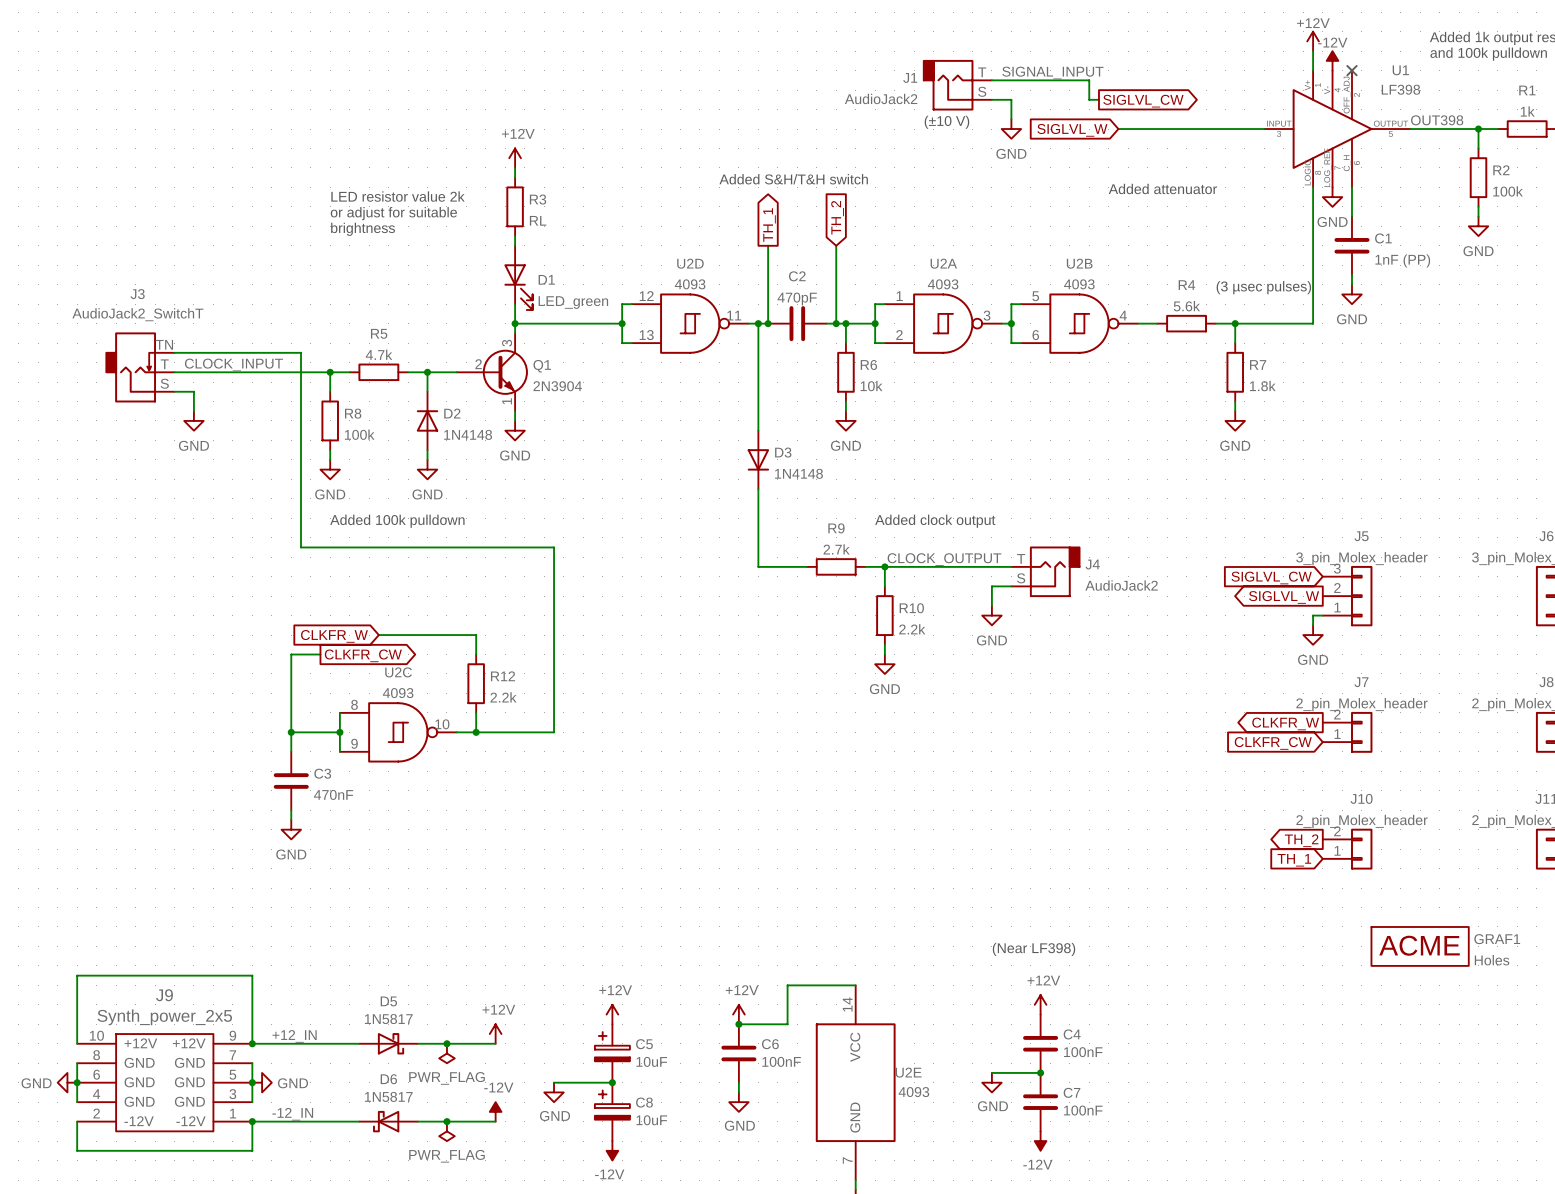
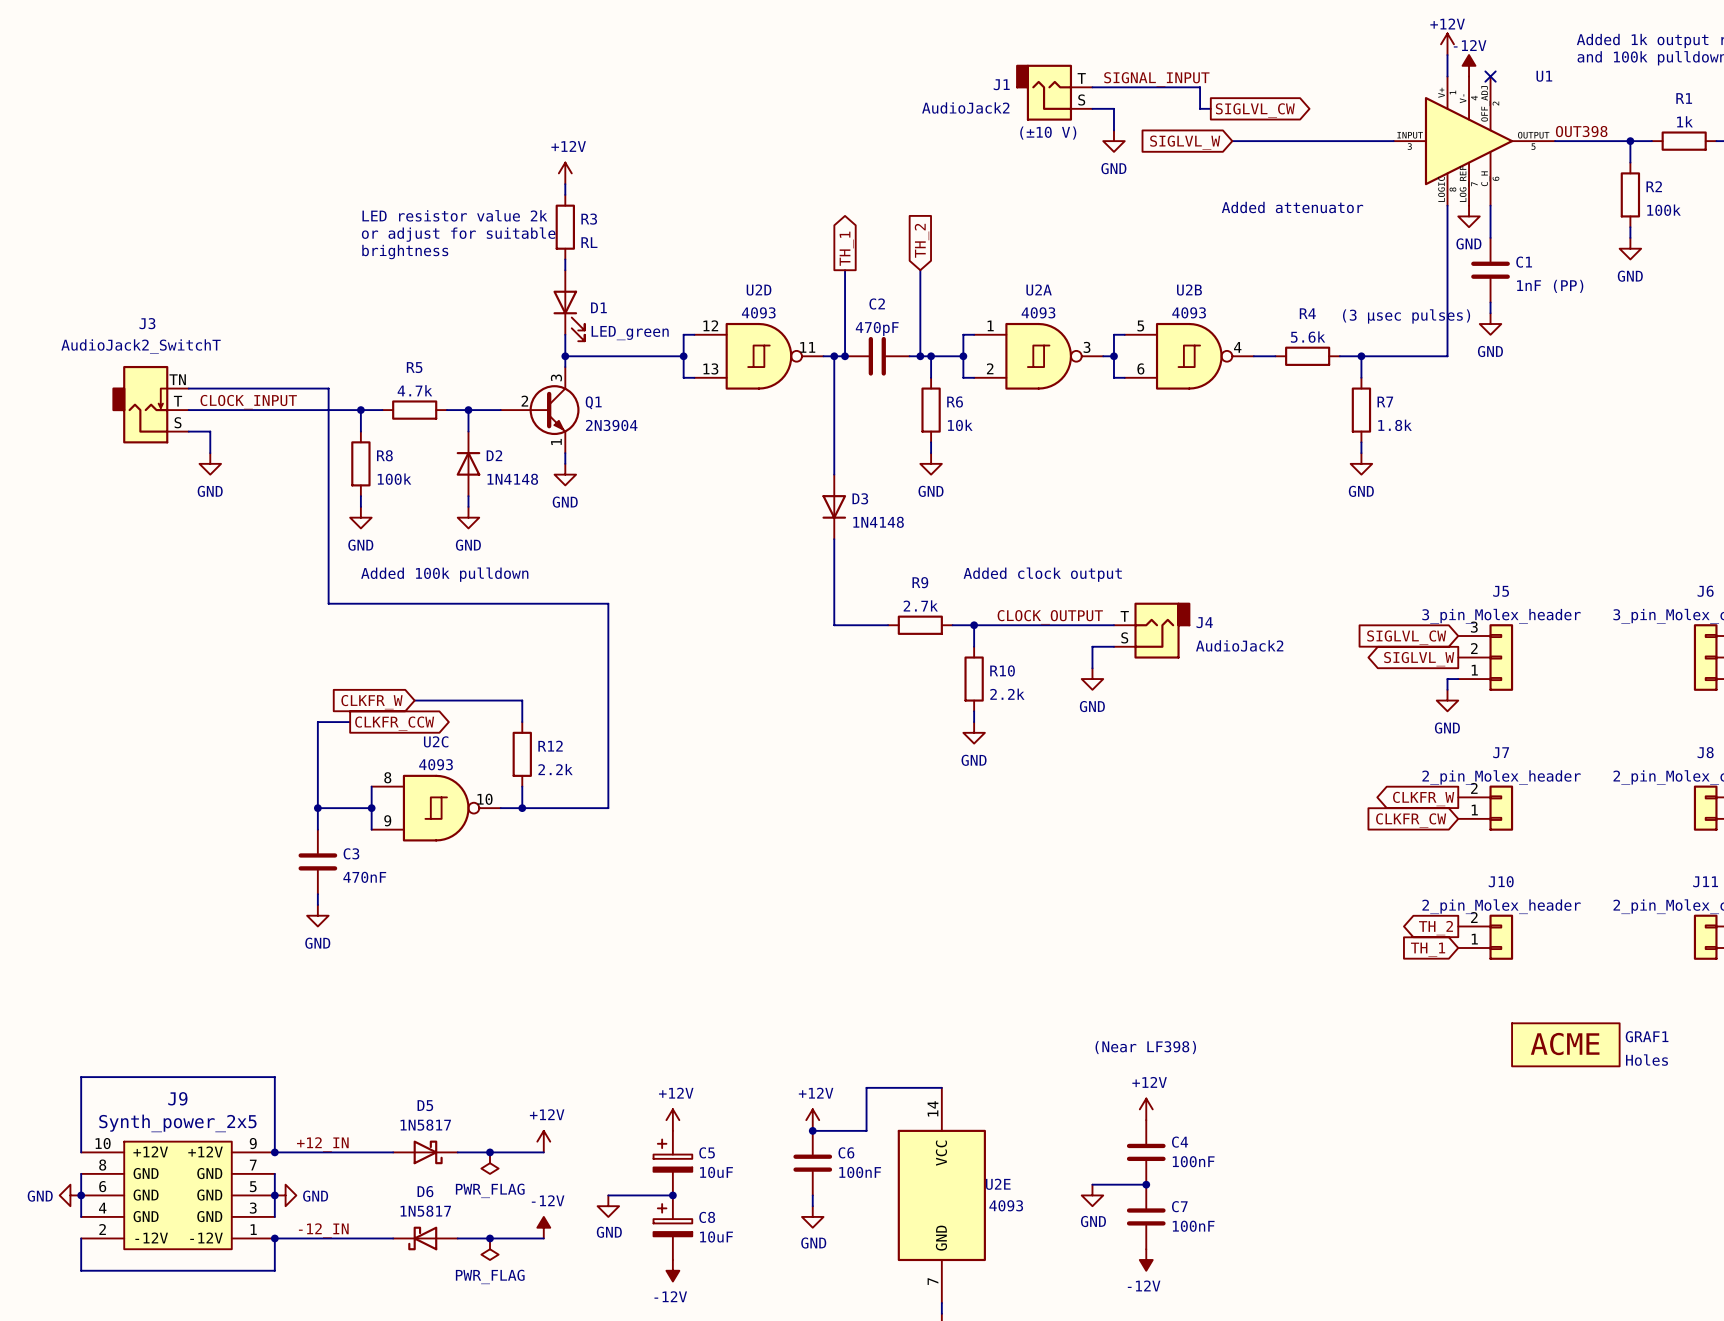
U1 value: LF398 (1400, 89) -> none
text: Added S&H/T&H switch (793, 179) -> none
global label: CLKFR_CW (363, 655) -> CLKFR_CCW (394, 723)

